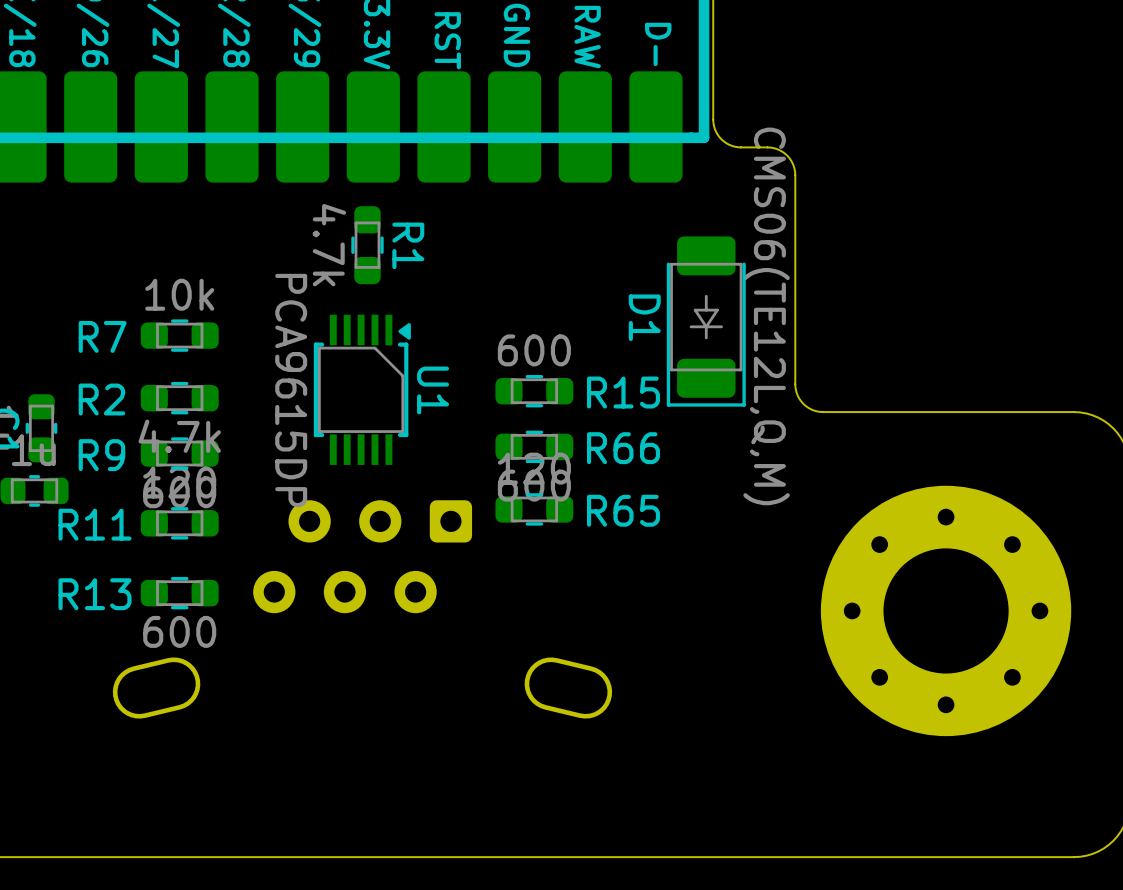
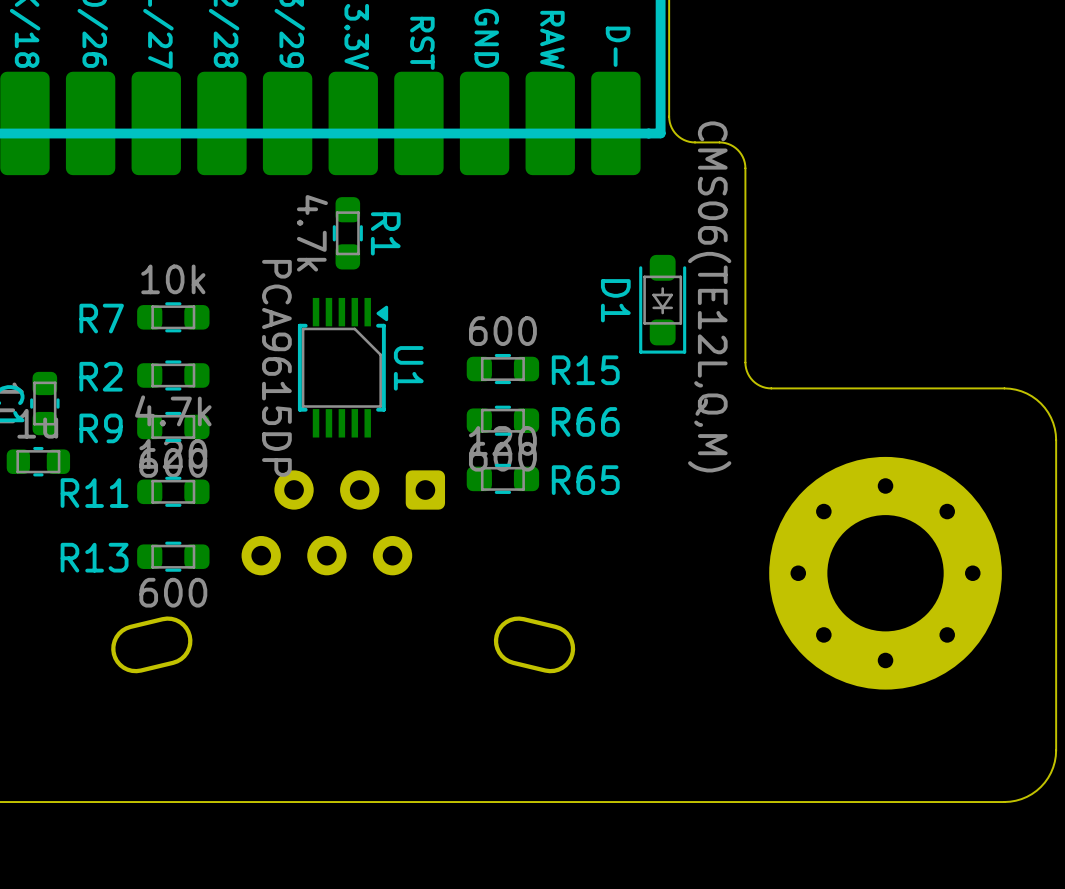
D1 footprint: [666, 236, 746, 407] -> [639, 254, 687, 354]

